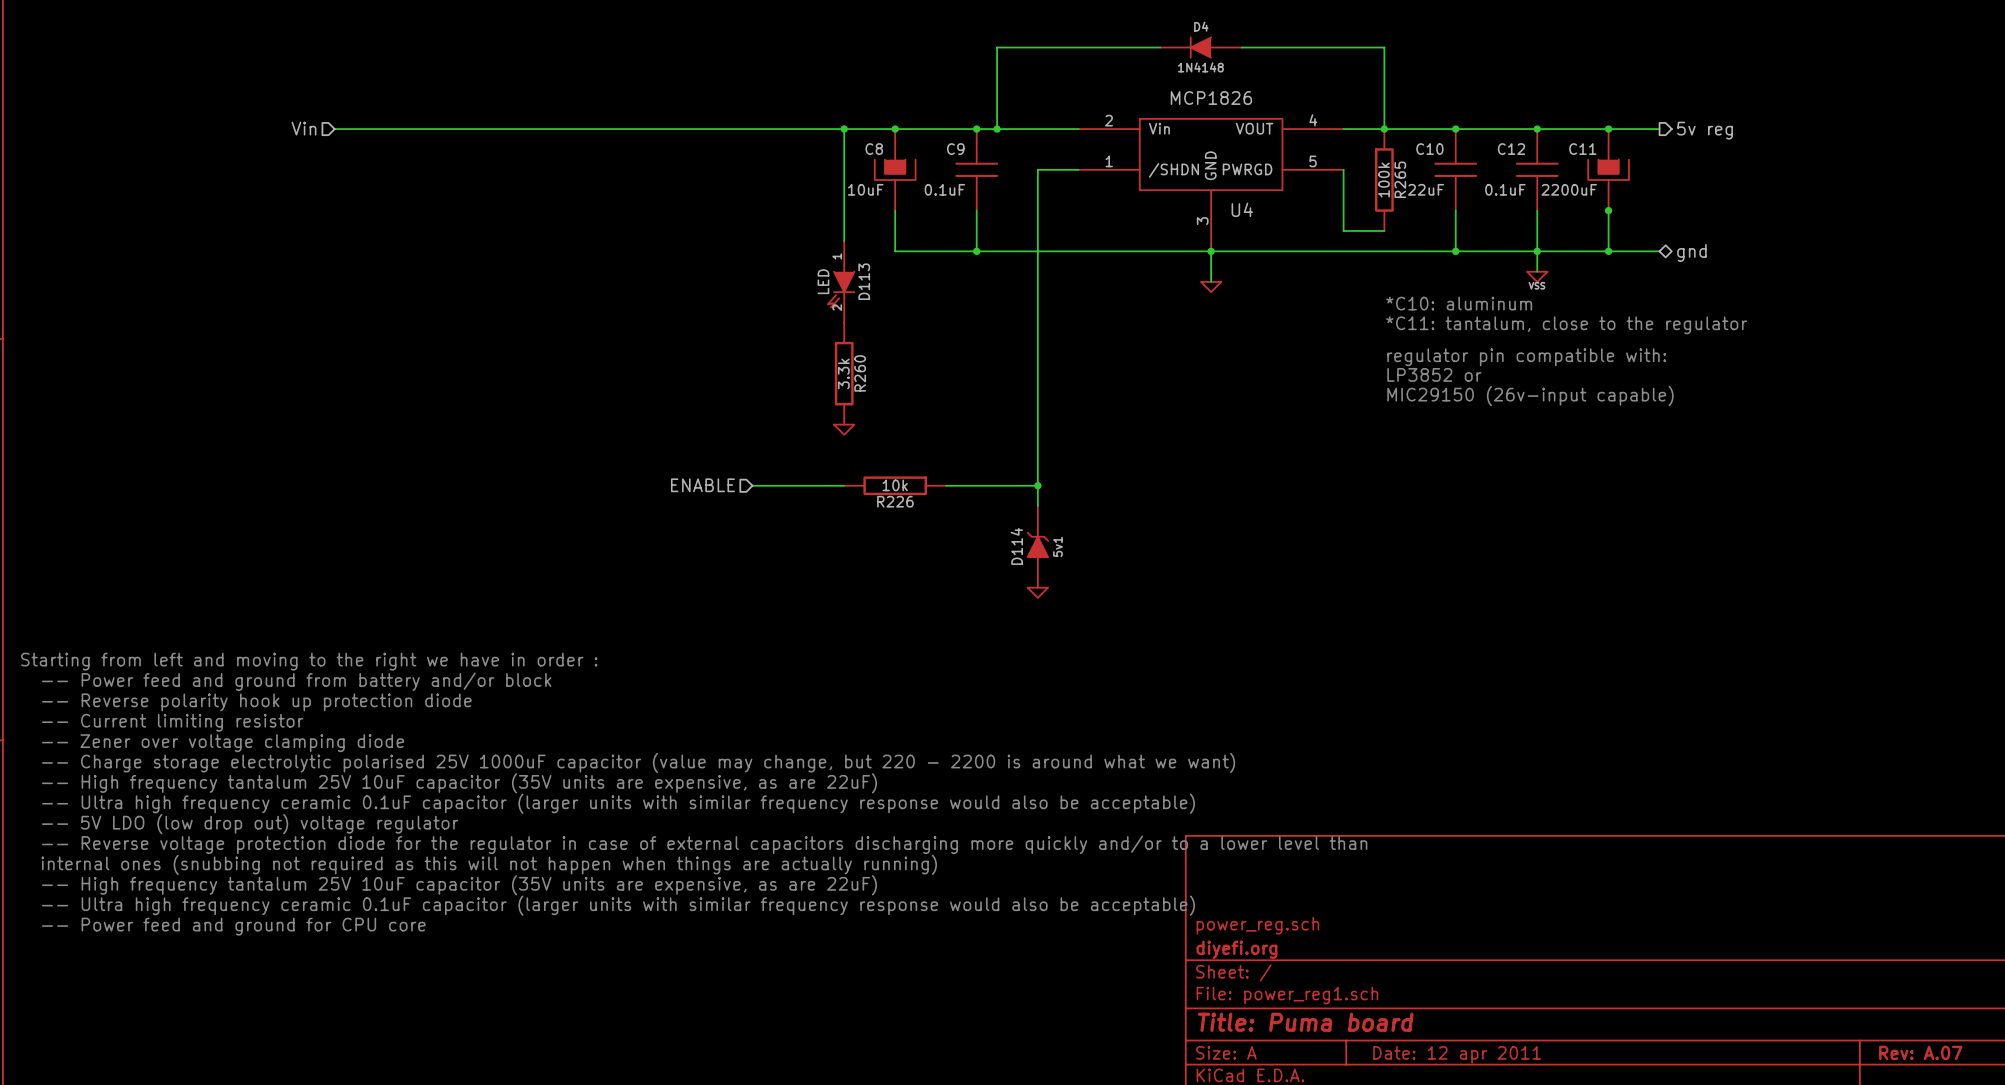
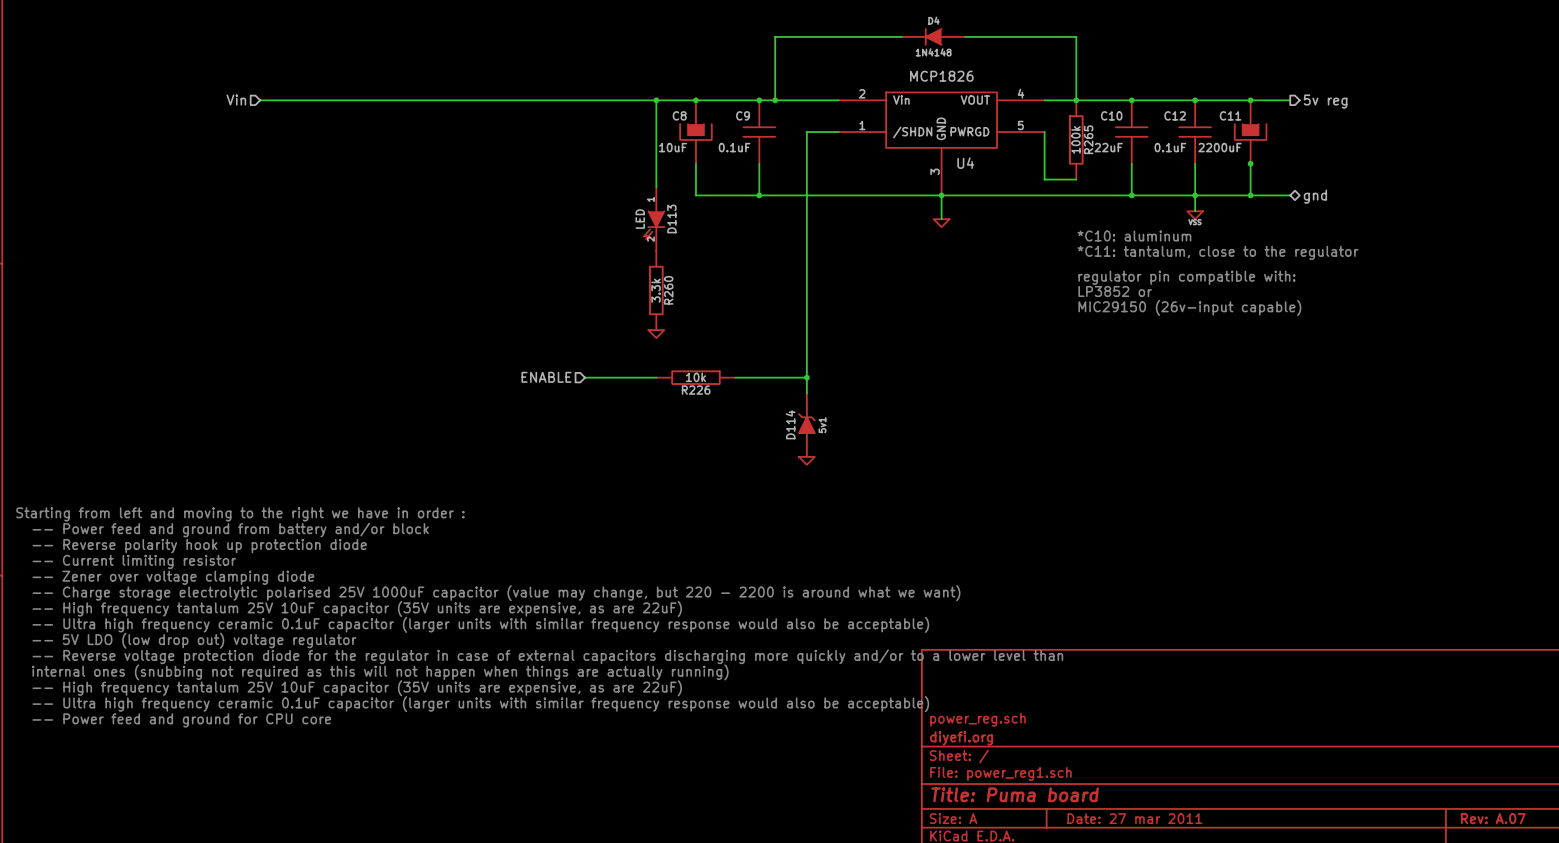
title block: Date: 12 apr 2011 (1457, 1054) -> Date: 27 mar 2011 (1134, 818)

